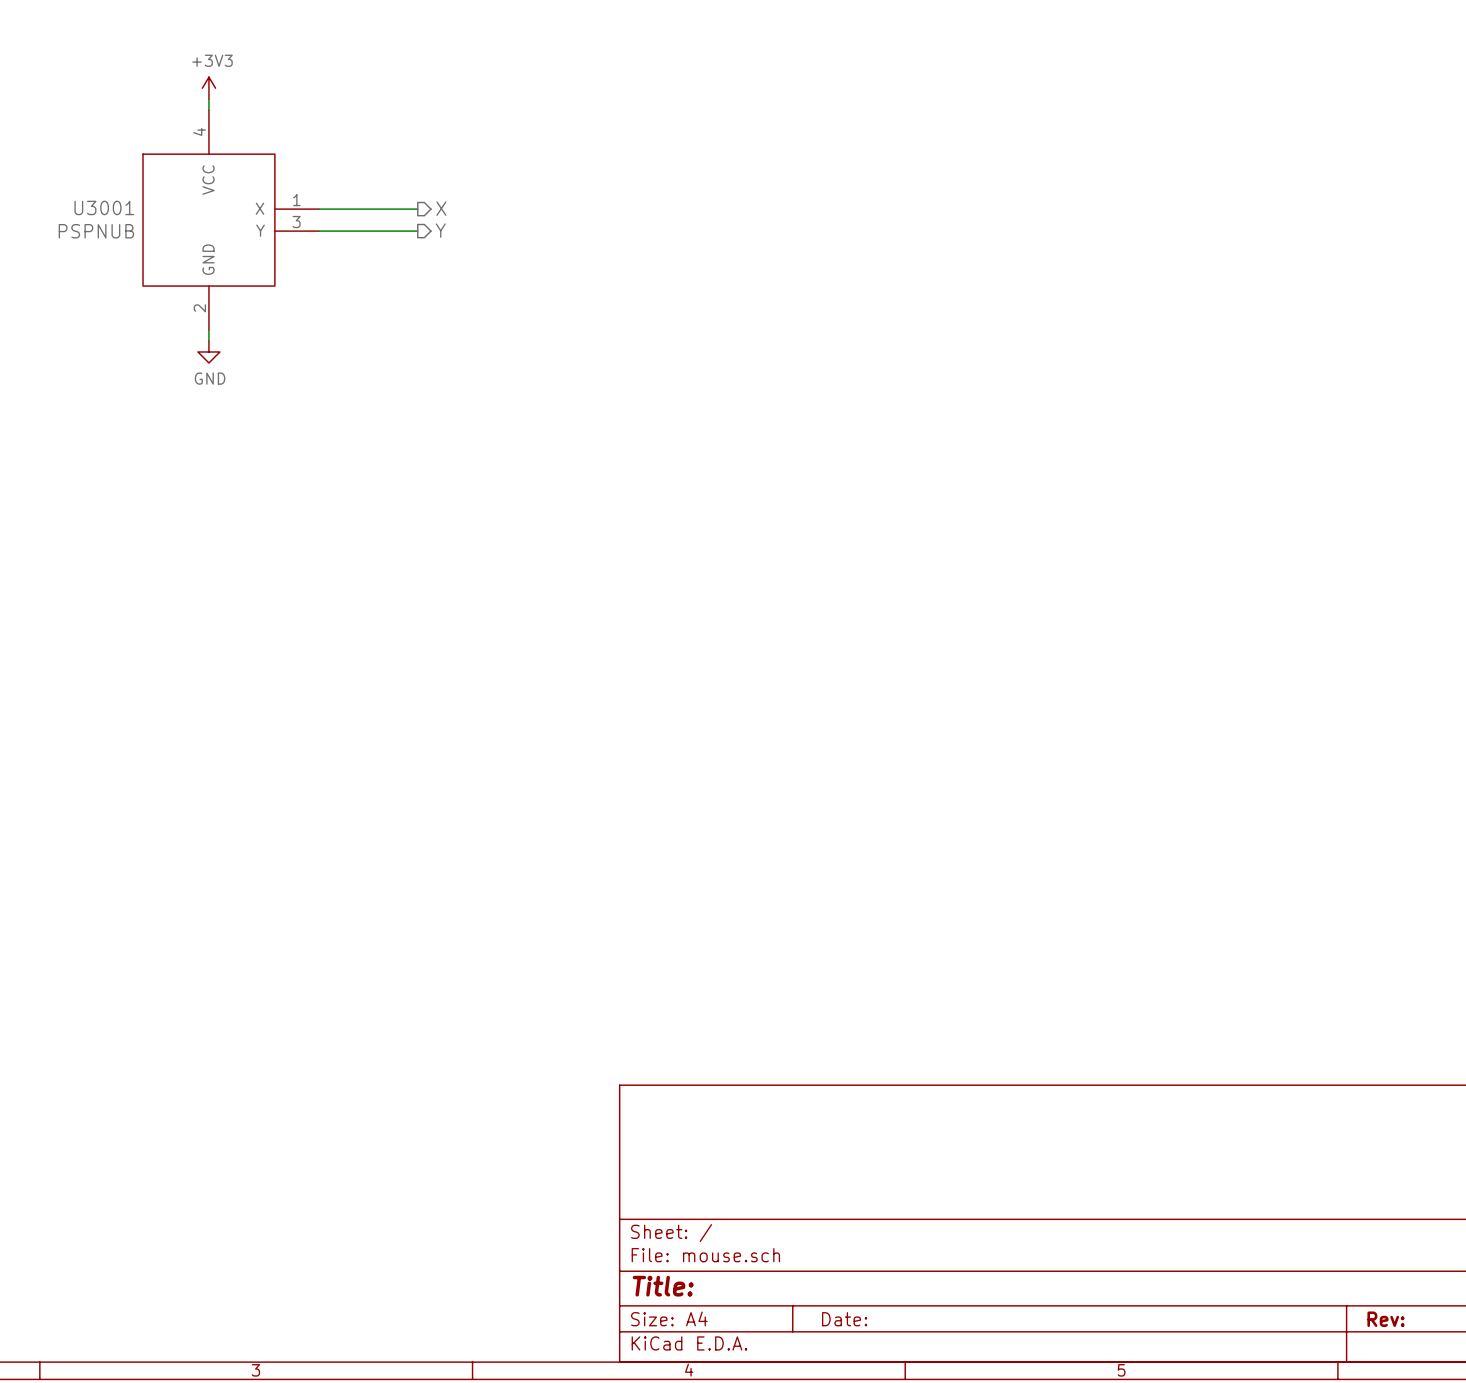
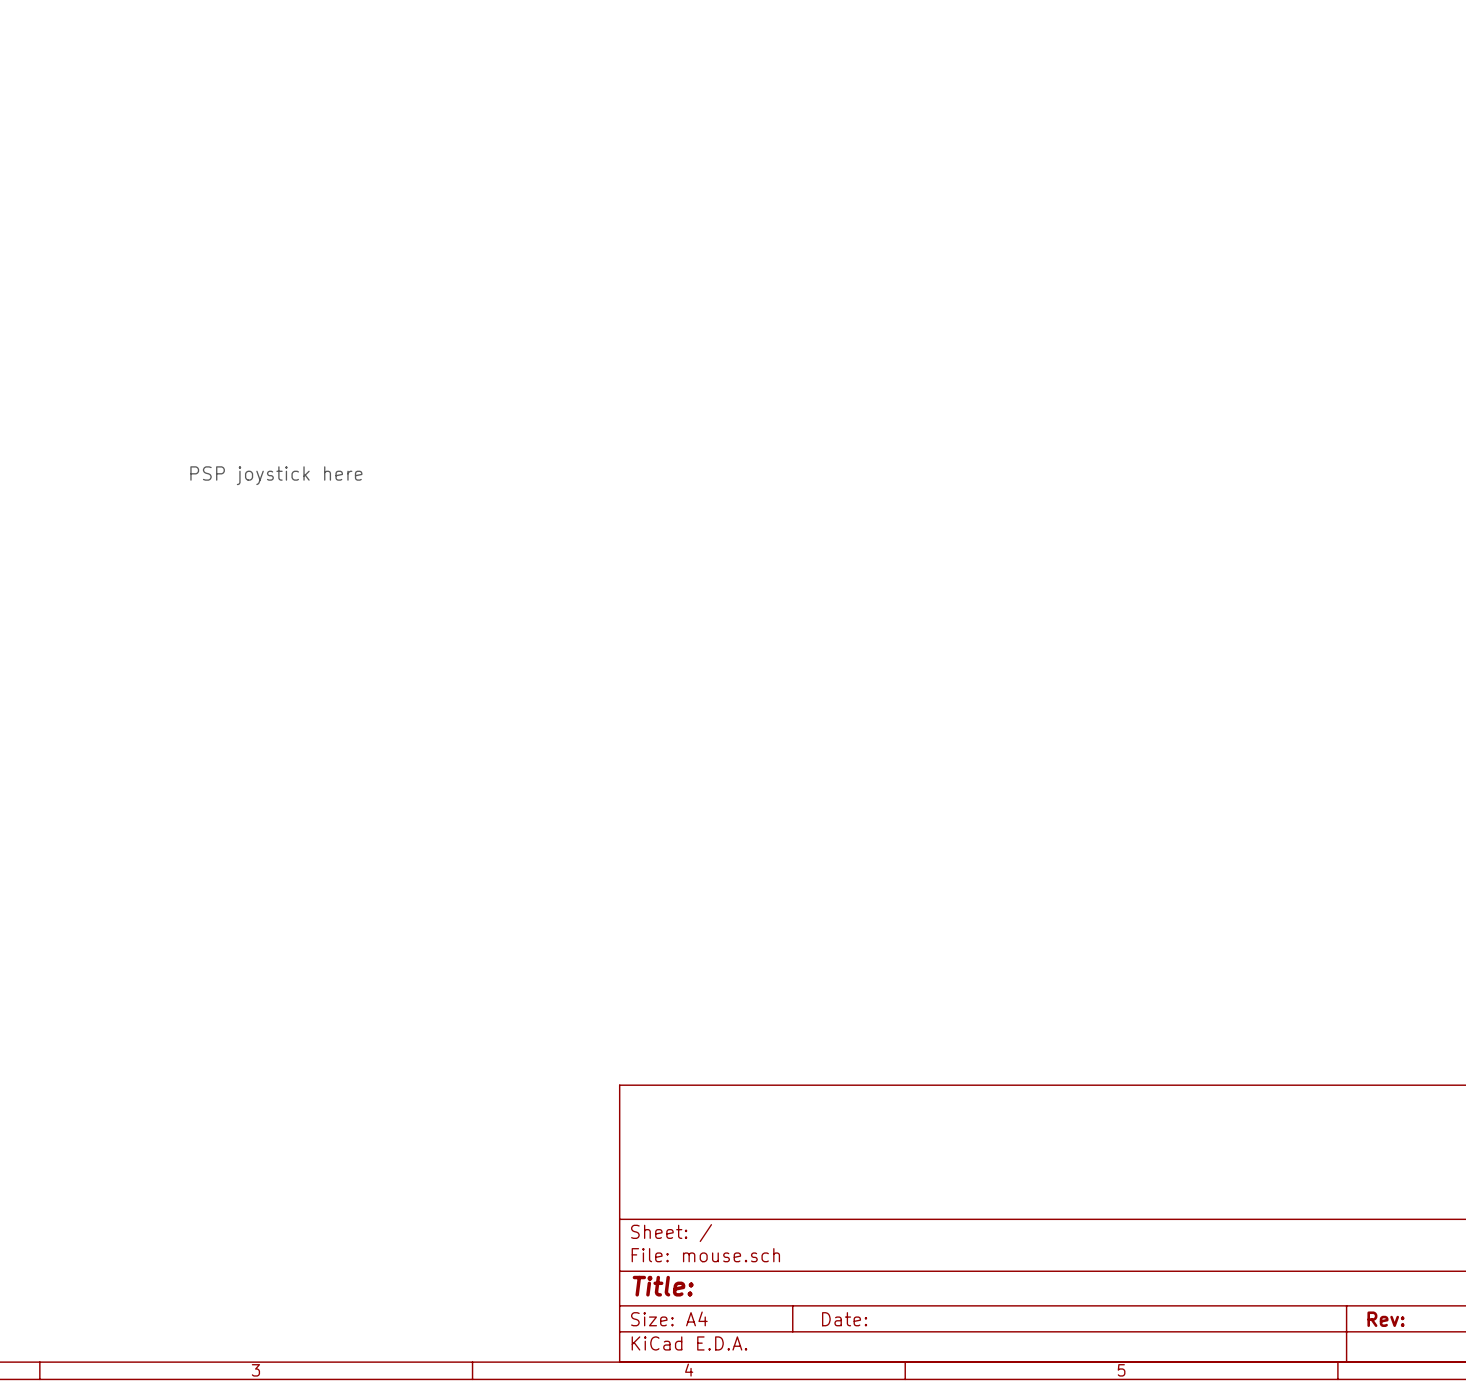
power symbol: +3V3 (208, 88) -> none
wire: (208, 99) (208, 110) -> none
hierarchical label: X (441, 208) -> none
wire: (318, 209) (417, 209) -> none
U3001: PSPNUB (230, 220) -> none
hierarchical label: Y (440, 230) -> none
wire: (318, 231) (417, 231) -> none
wire: (208, 330) (208, 341) -> none
power symbol: GND (208, 351) -> none
text: none -> PSP joystick here (276, 475)

